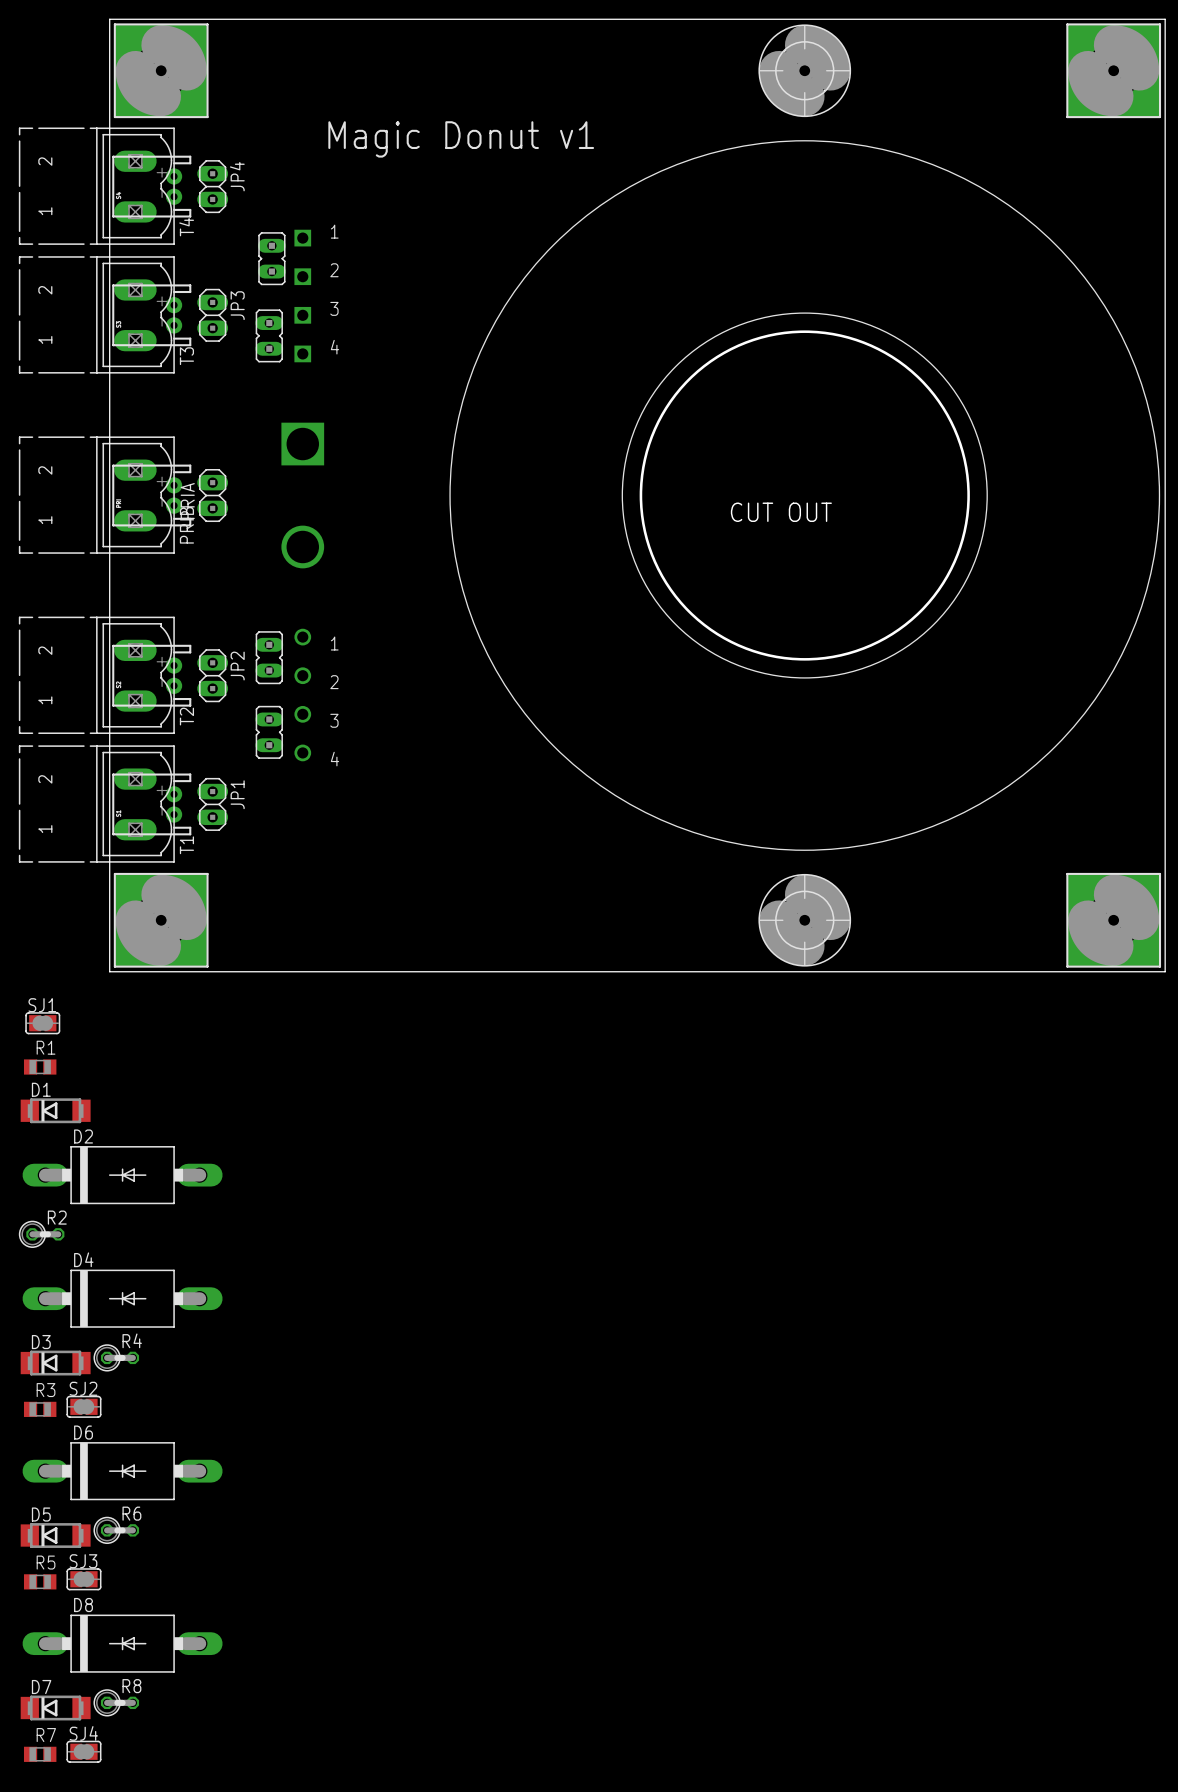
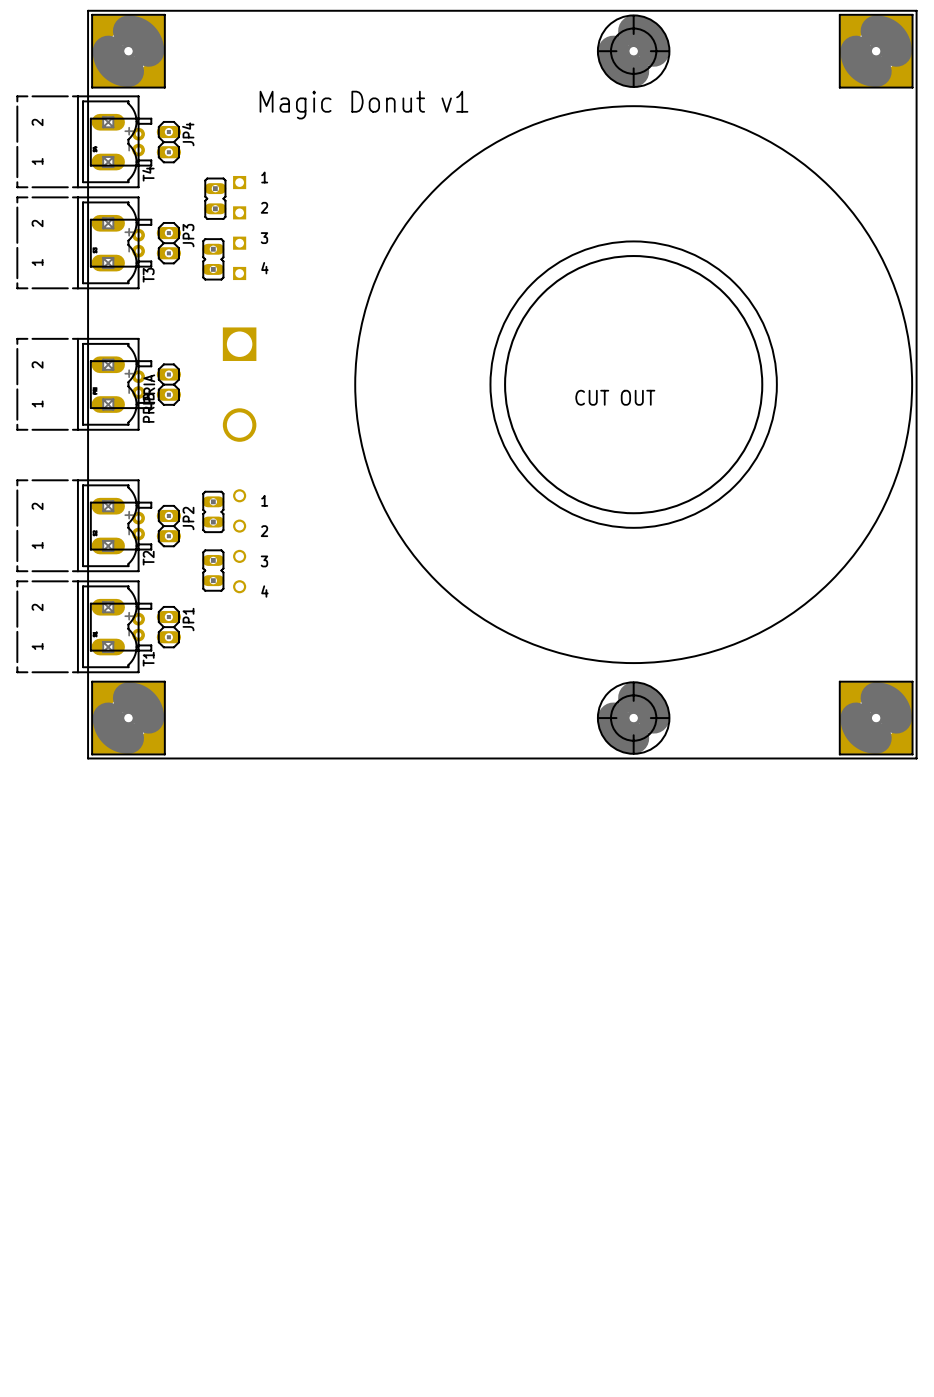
SJ1: (42, 1023) -> none
R1: (40, 1067) -> none
D1: (55, 1110) -> none
D2: (122, 1175) -> none
R2: (41, 1234) -> none
D4: (122, 1298) -> none
R4: (116, 1357) -> none
D3: (55, 1363) -> none
SJ2: (83, 1406) -> none
R3: (40, 1409) -> none
D6: (122, 1471) -> none
R6: (116, 1530) -> none
D5: (55, 1535) -> none
SJ3: (83, 1579) -> none
R5: (40, 1581) -> none
D8: (122, 1643) -> none
R8: (116, 1702) -> none
D7: (55, 1708) -> none
SJ4: (83, 1751) -> none
R7: (40, 1754) -> none

